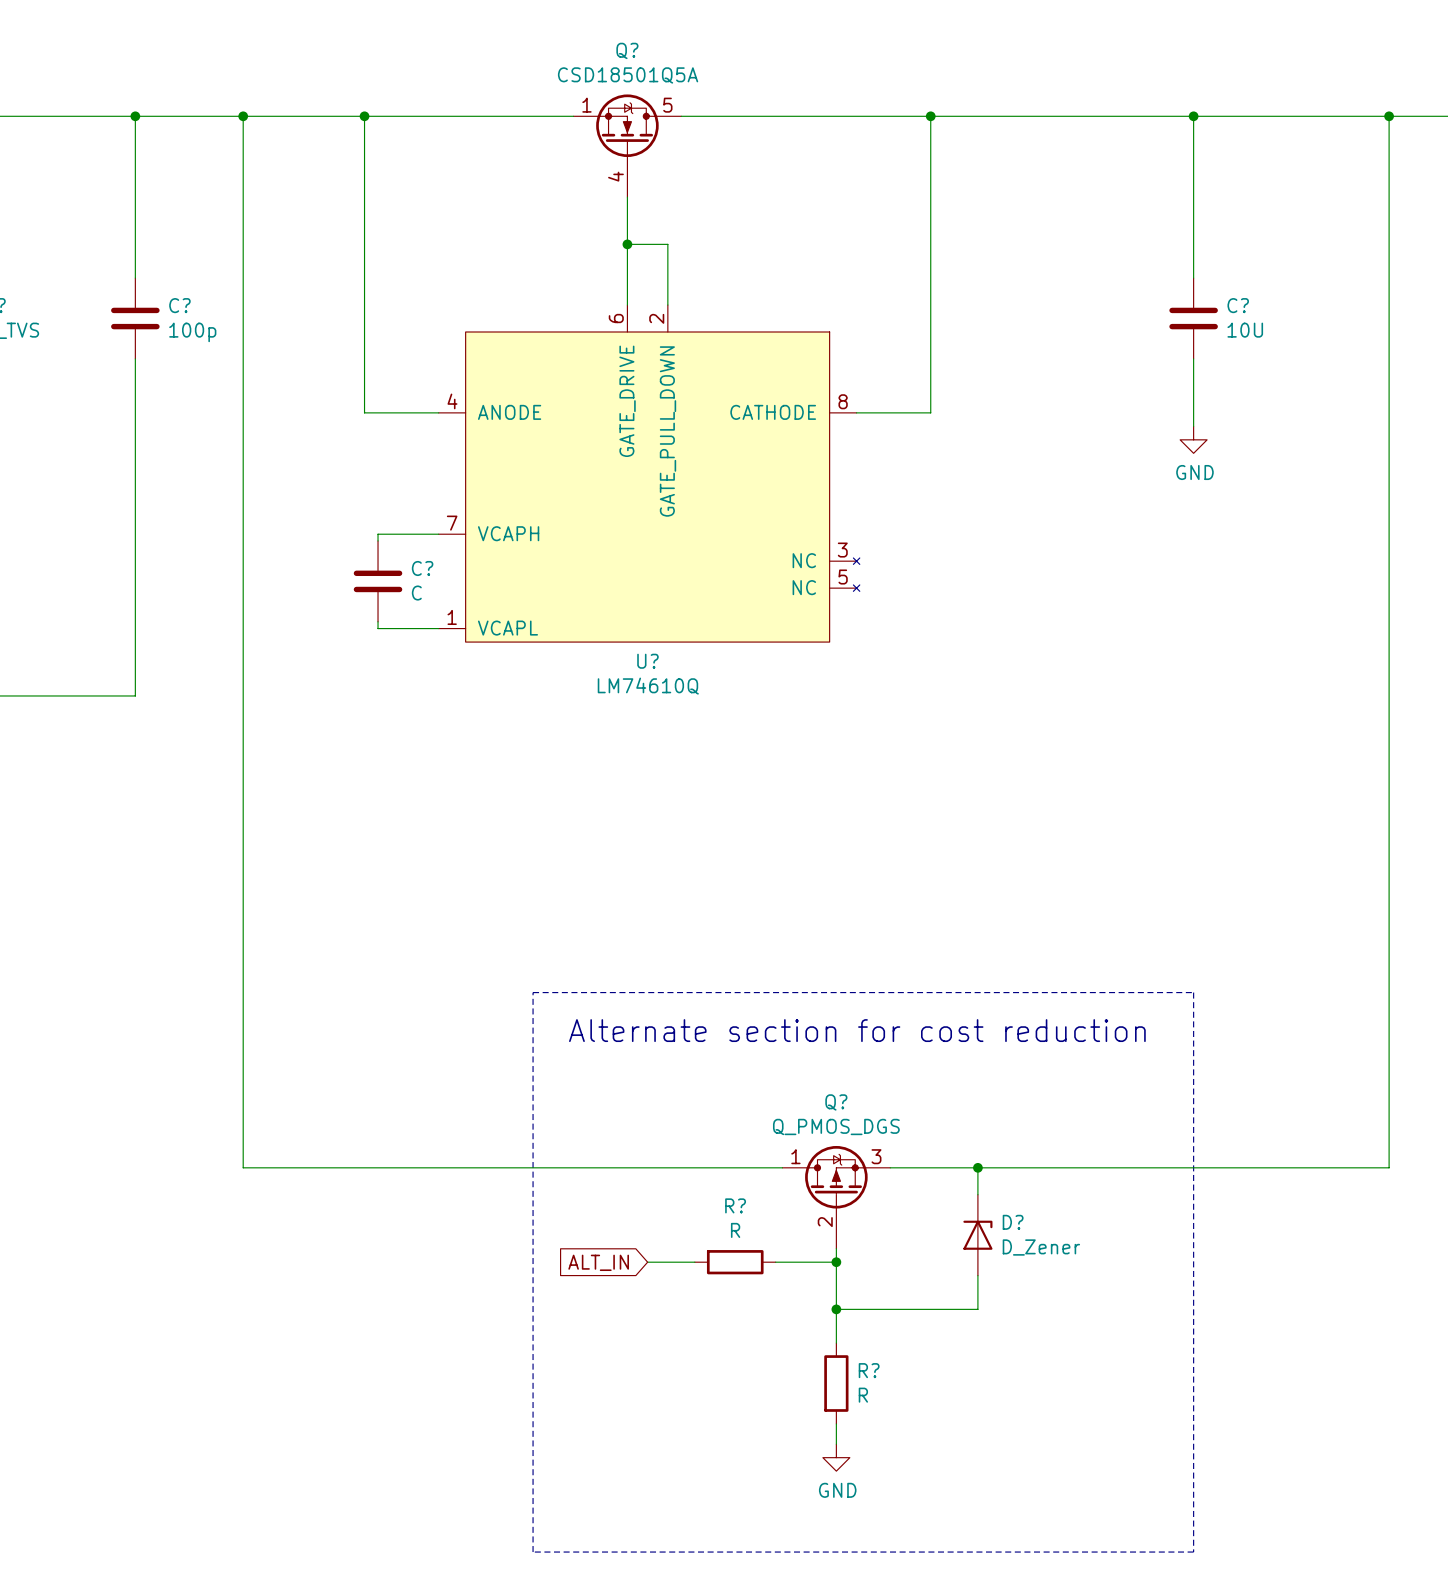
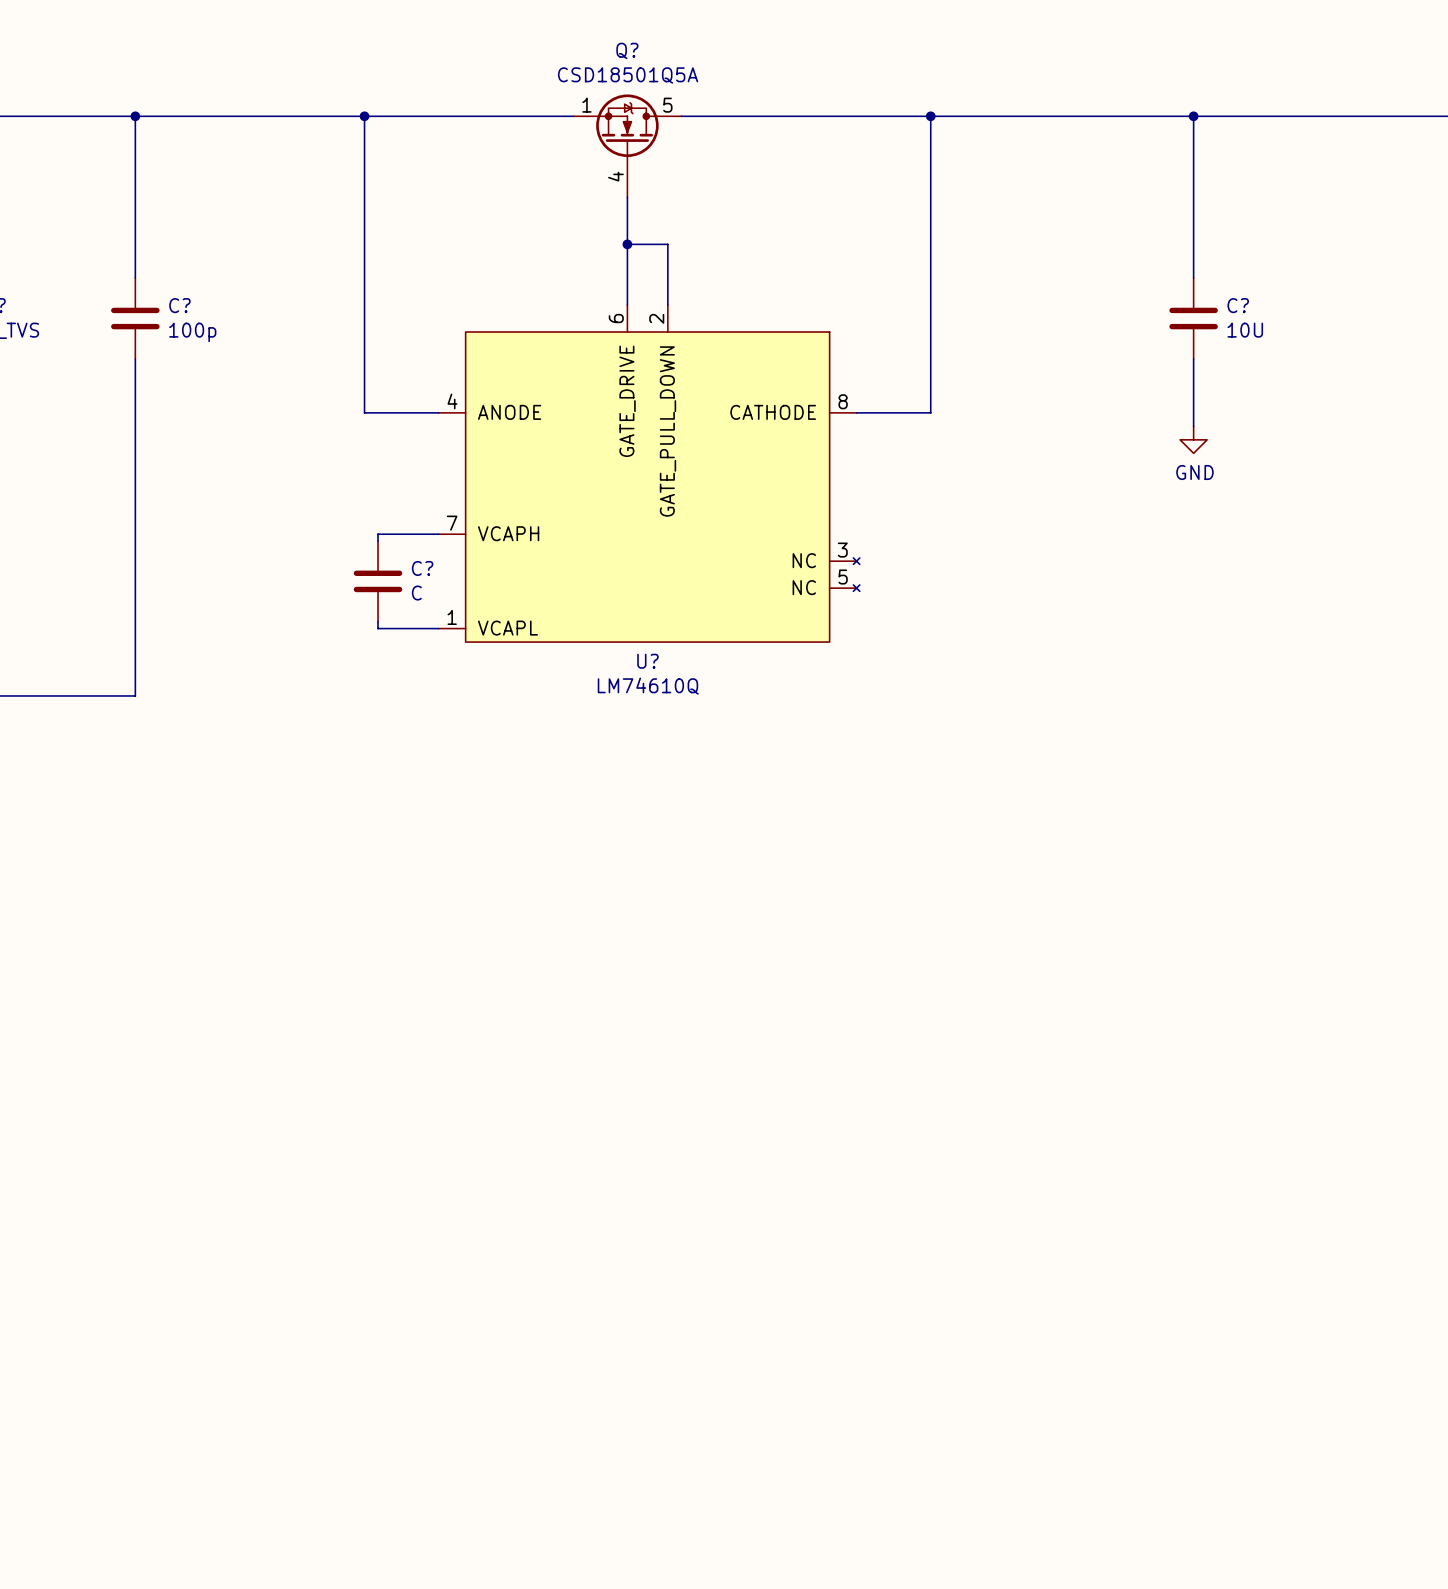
wire: (243, 116) (243, 1167) (782, 1167) -> none
junction: (243, 116) -> none
wire: (1389, 116) (1389, 1167) (890, 1167) -> none
junction: (1389, 116) -> none
line: (533, 992) (1193, 992) (1193, 1552) (533, 1552) (533, 992) -> none
text: Alternate section for cost reduction (857, 1030) -> none
wire: (977, 1167) (977, 1194) -> none
junction: (977, 1167) -> none
Q?: Q_PMOS_DGS (836, 1197) -> none
D?: D_Zener (977, 1235) -> none
wire: (836, 1248) (836, 1343) -> none
global label: ALT_IN (598, 1262) -> none
wire: (647, 1262) (694, 1262) -> none
R?: R (735, 1262) -> none
wire: (775, 1262) (836, 1262) -> none
junction: (836, 1262) -> none
wire: (977, 1275) (977, 1309) (836, 1309) -> none
junction: (836, 1309) -> none
R?: R (836, 1383) -> none
wire: (836, 1423) (836, 1444) -> none
power symbol: GND (836, 1457) -> none

